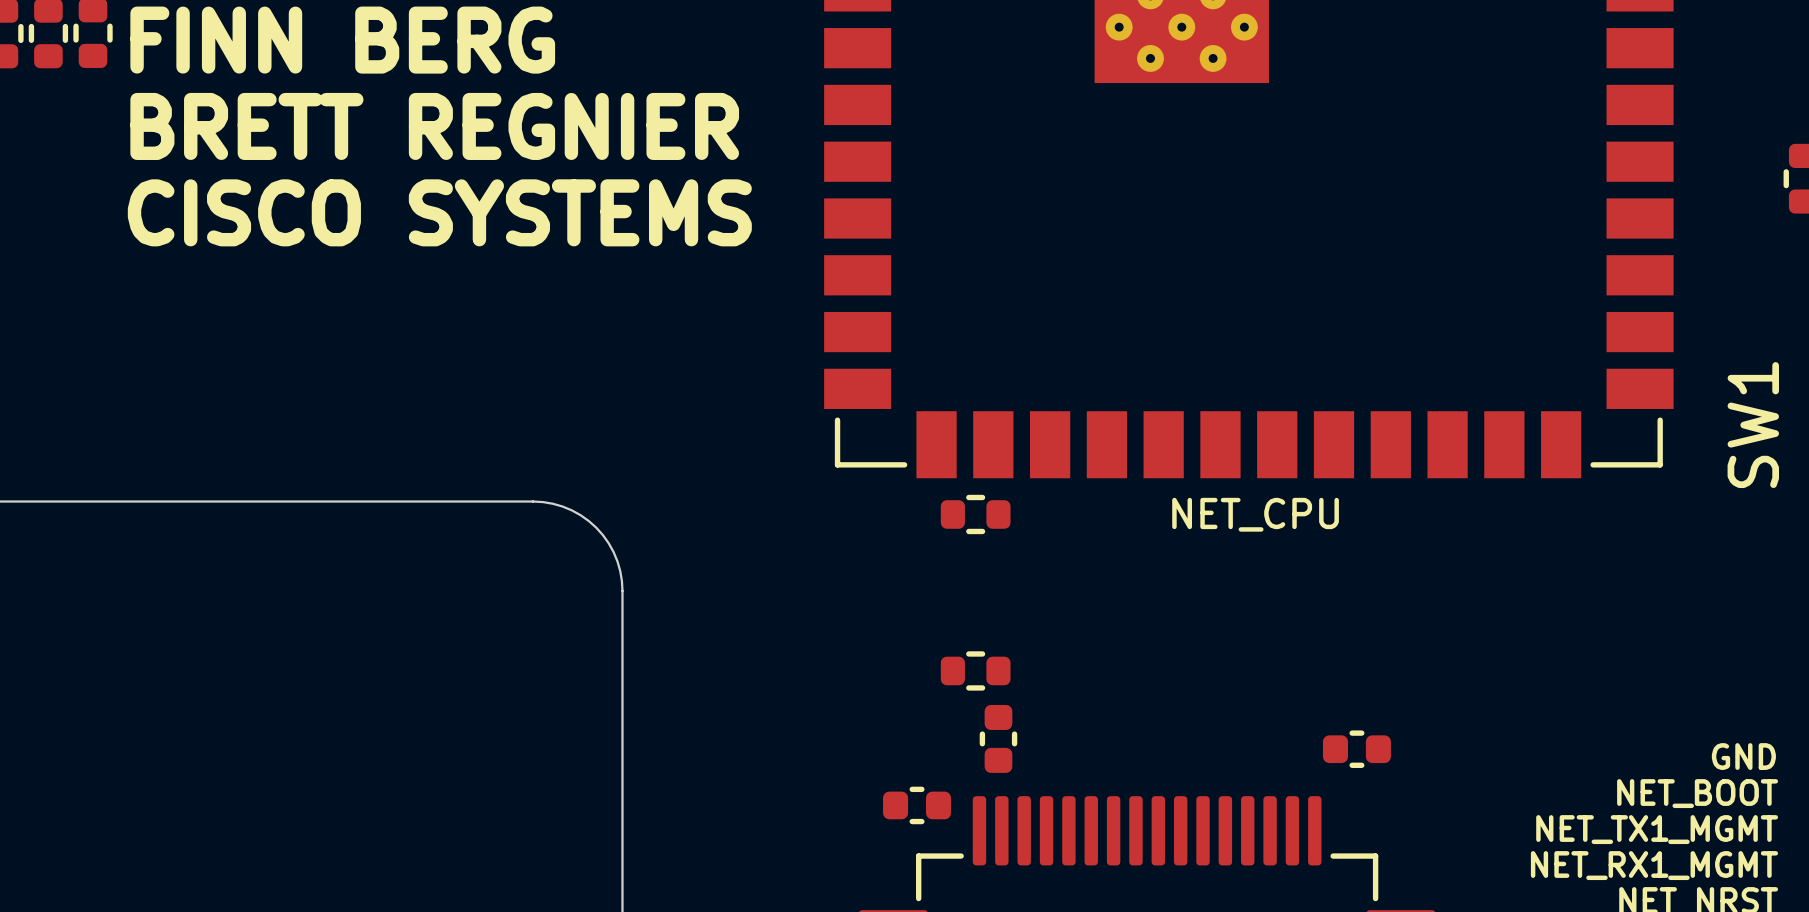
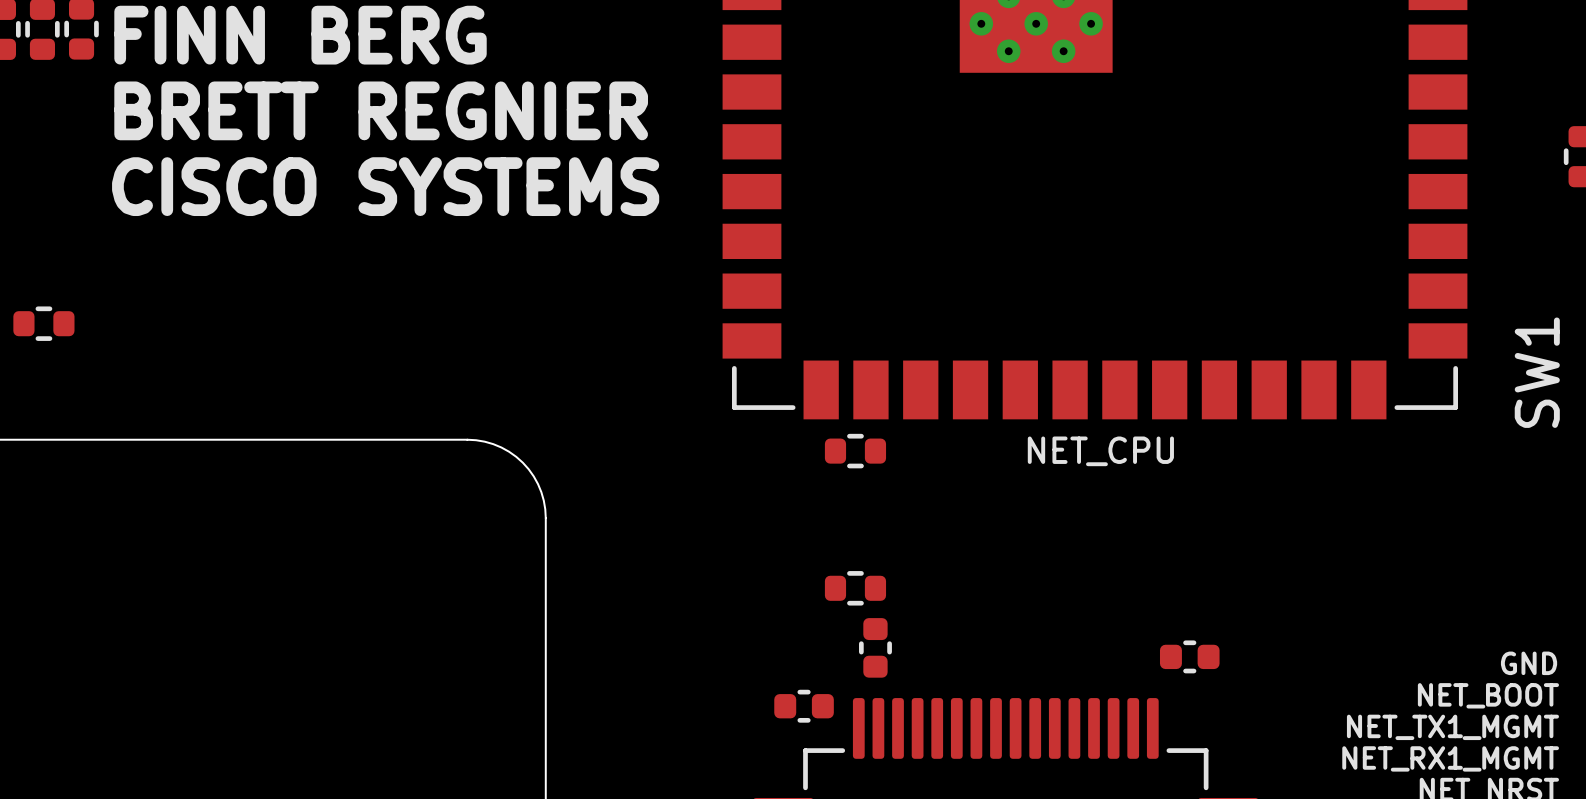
part: none -> (43, 323)

